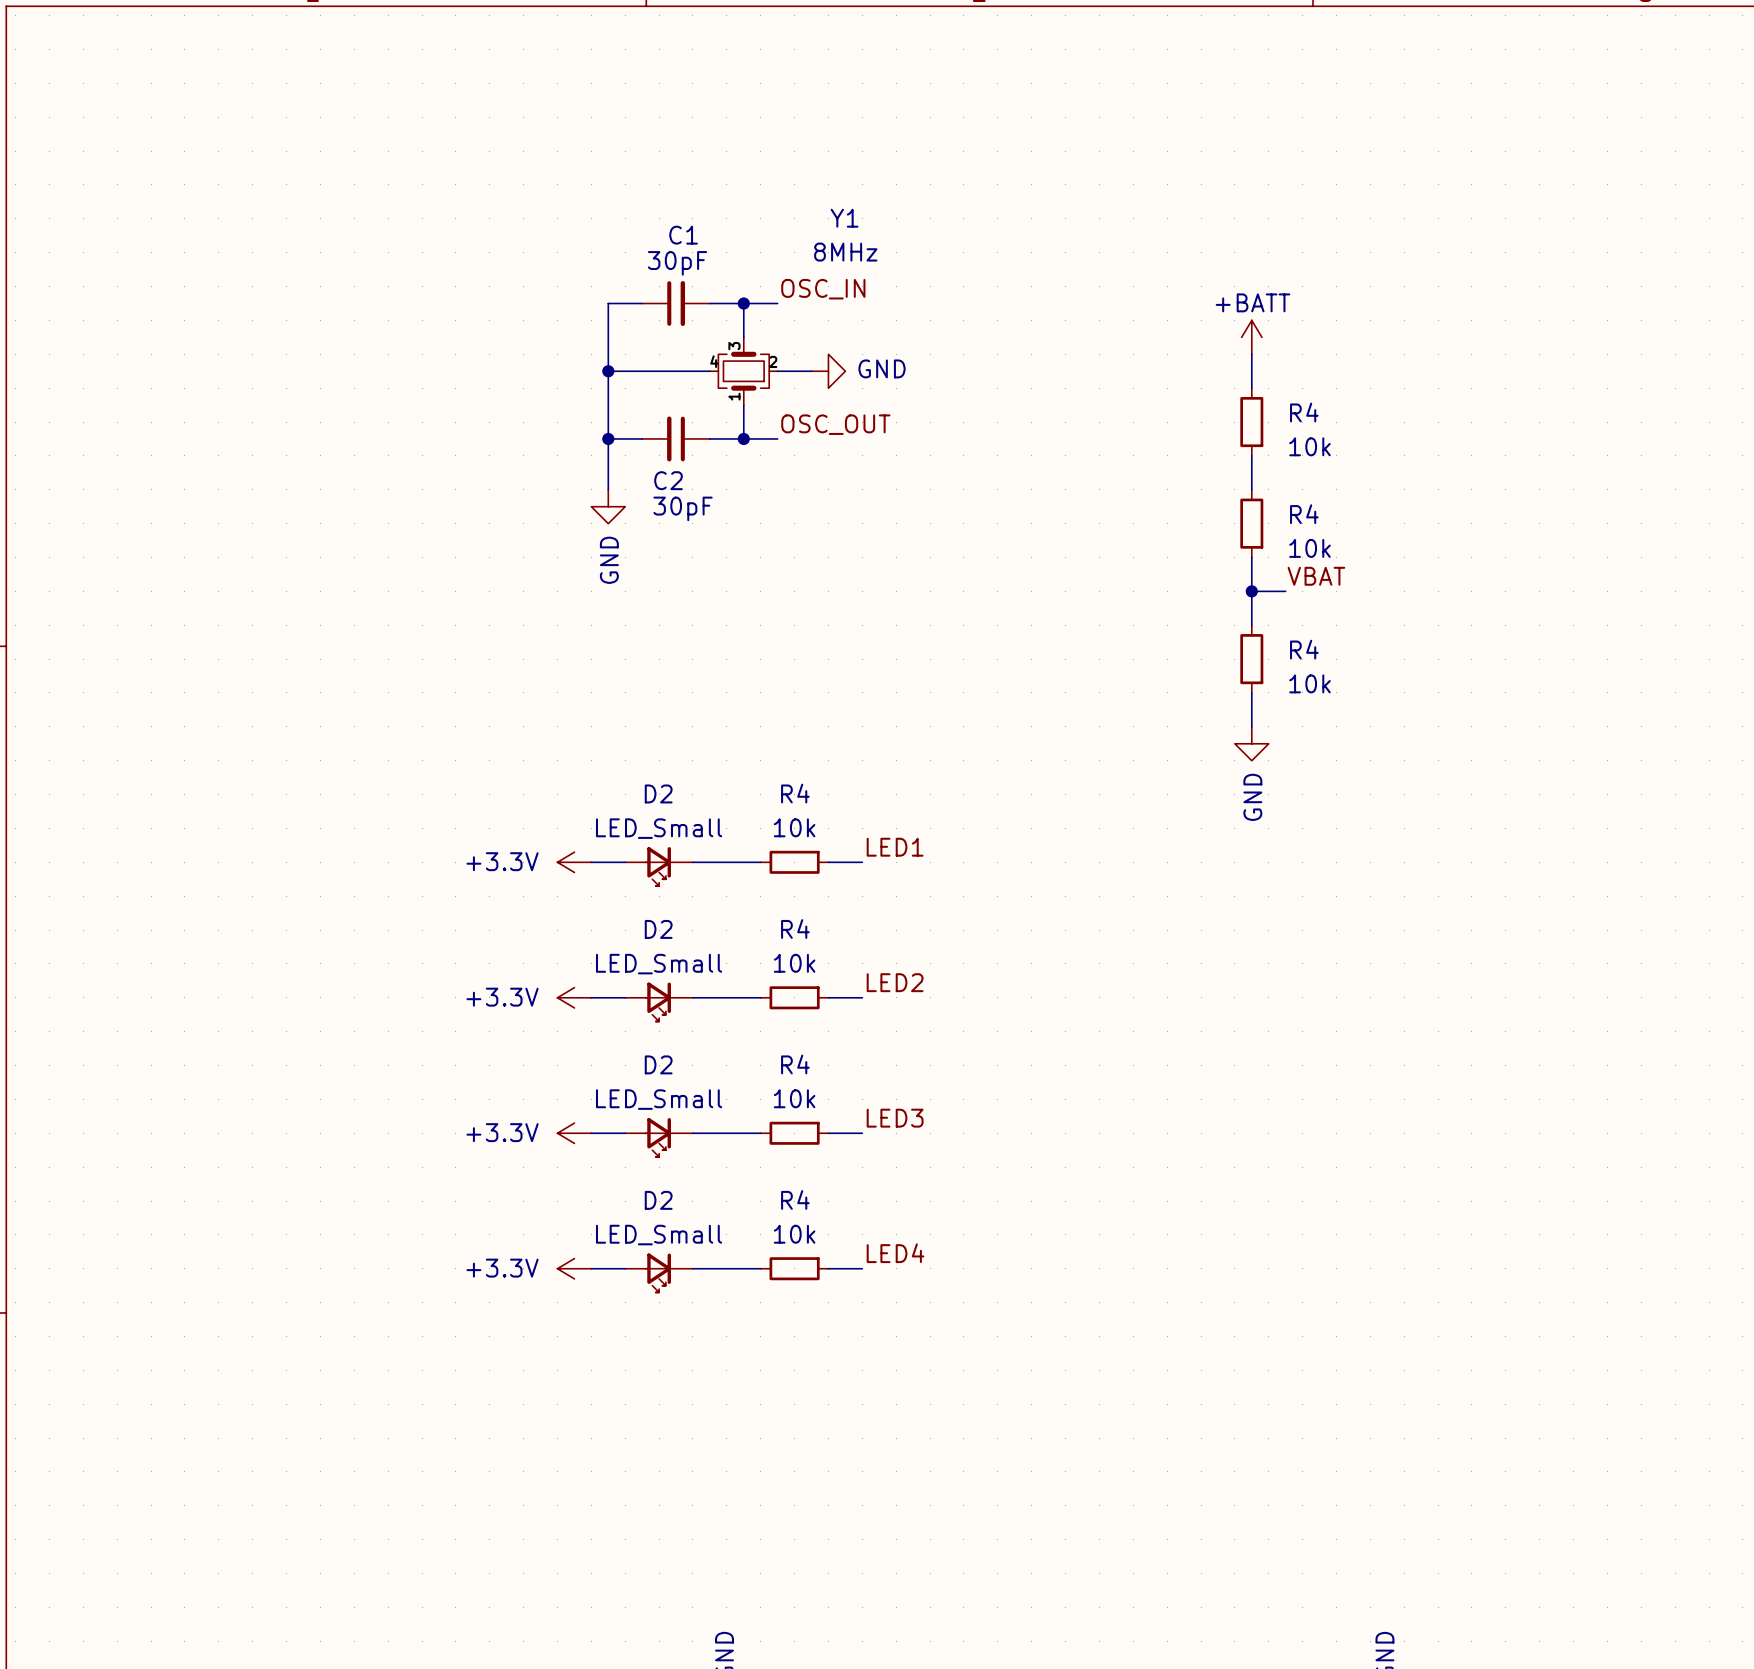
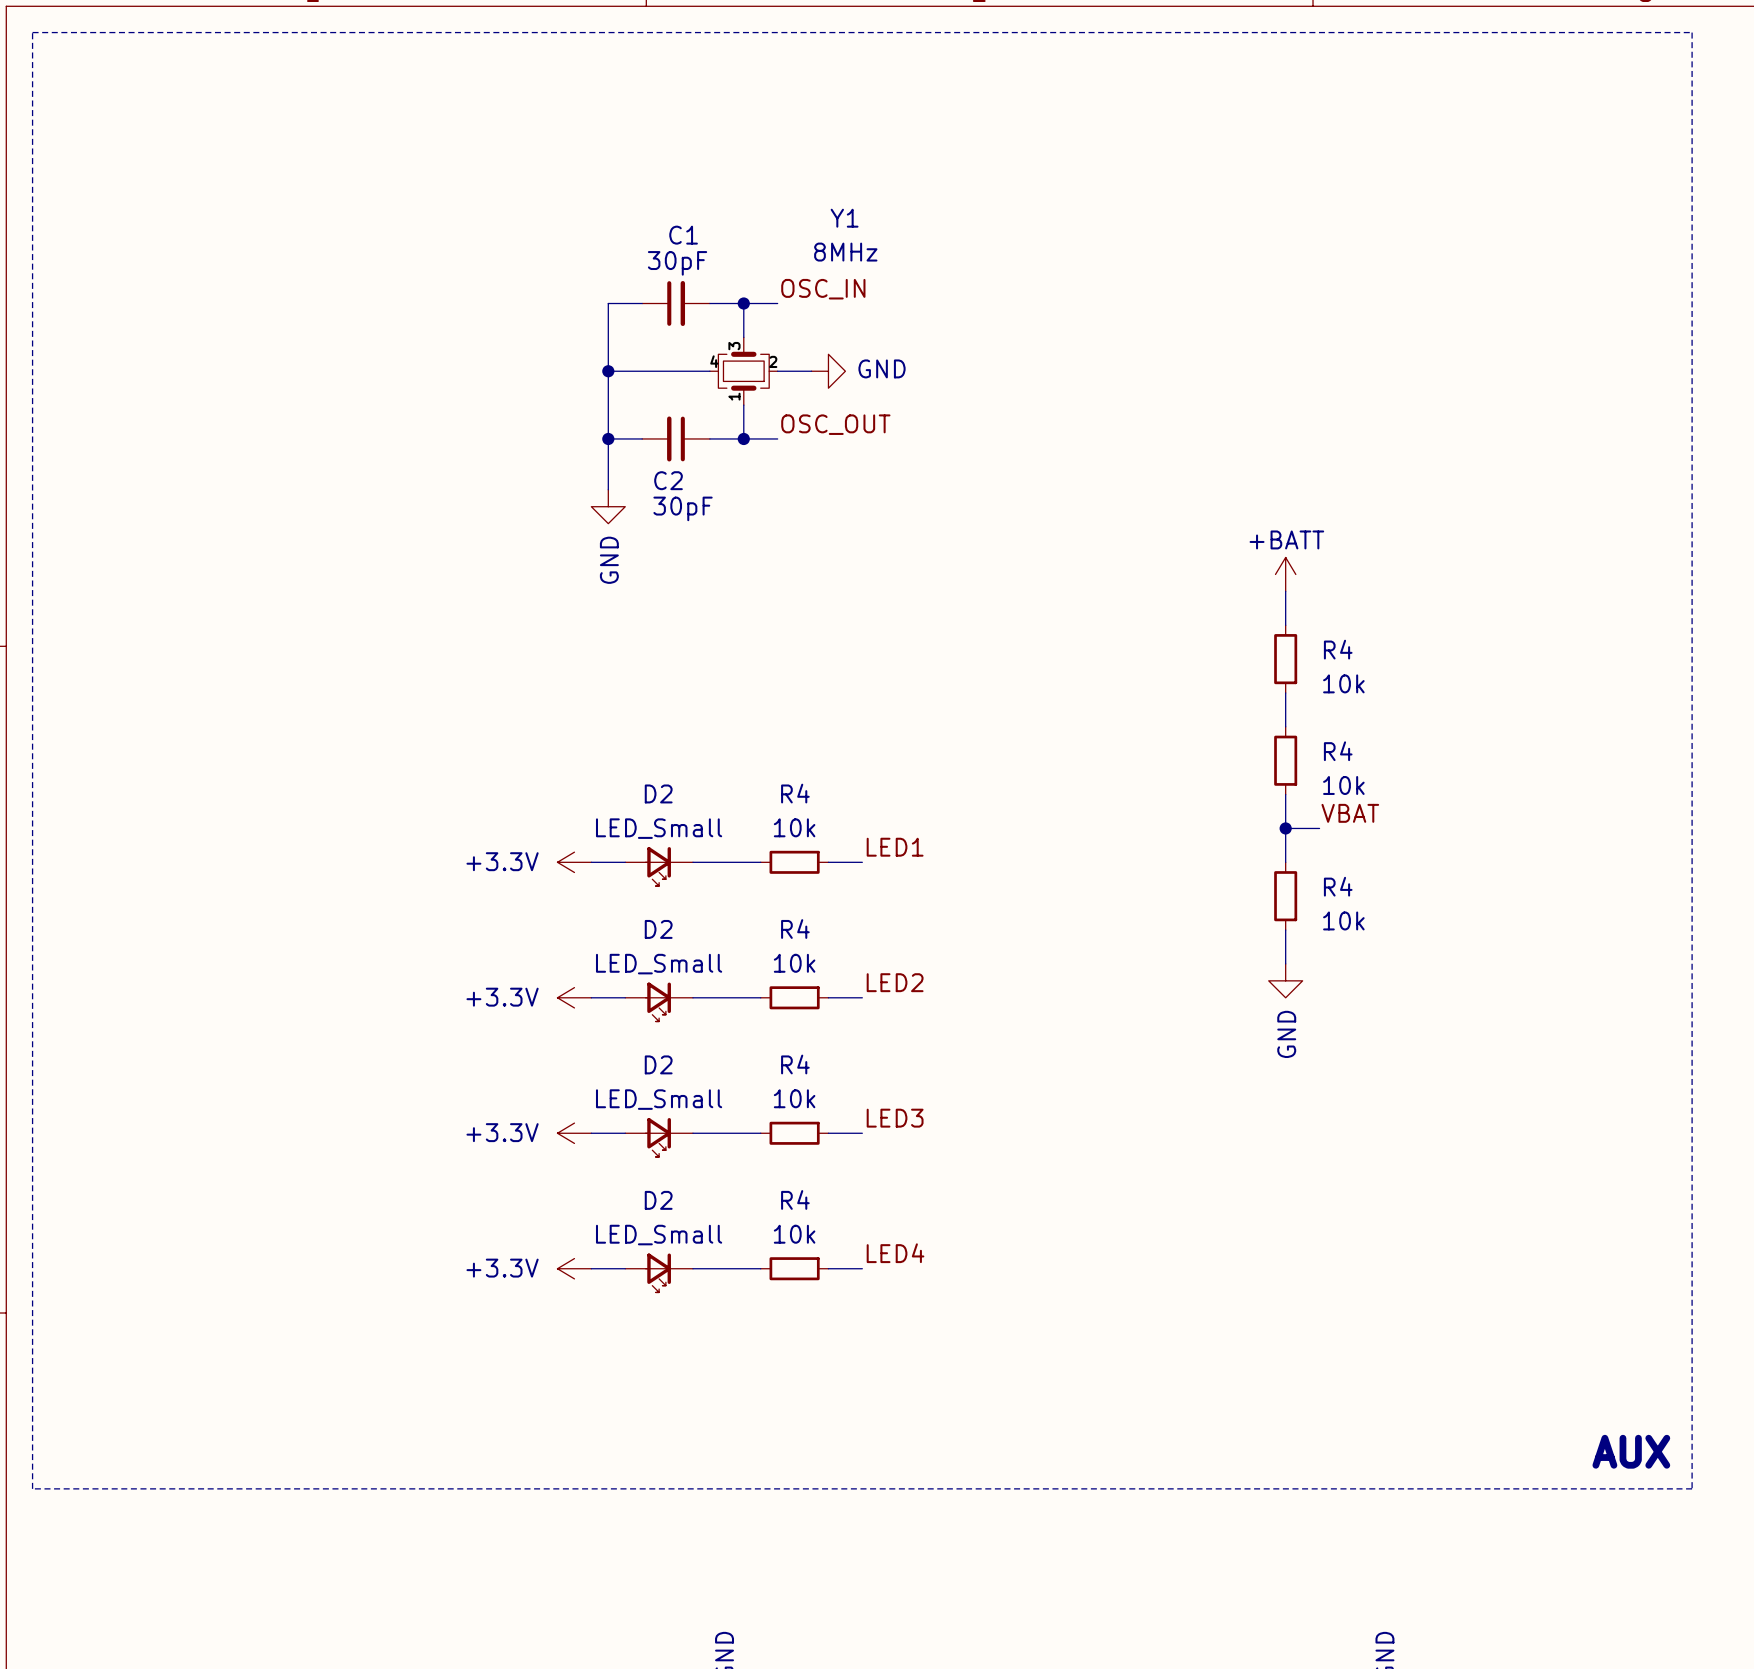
line: none -> (32, 32) (1692, 32) (1692, 1488) (32, 1488) (32, 32)
power symbol position: +BATT (1251, 337) -> +BATT (1285, 574)
wire: (1251, 354) (1251, 388) -> none
R4: 10k (1251, 422) -> none
wire: (1251, 455) (1251, 489) -> (1285, 692) (1285, 726)
R4: 10k (1251, 523) -> none
wire: (1251, 557) (1251, 625) -> (1285, 794) (1285, 862)
label position: VBAT (1316, 576) -> VBAT (1350, 813)
wire: (1251, 591) (1285, 591) -> (1285, 625) (1285, 591)
junction: (1251, 591) -> none
R4 position: (1251, 659) -> (1285, 659)
wire: (1251, 692) (1251, 726) -> (1285, 930) (1285, 963)
power symbol position: GND (1251, 743) -> GND (1285, 980)
R4: none -> 10k (1285, 760)
wire: none -> (1285, 828) (1319, 828)
junction: none -> (1285, 828)
R4: none -> 10k (1285, 896)
text: none -> AUX (1631, 1451)

